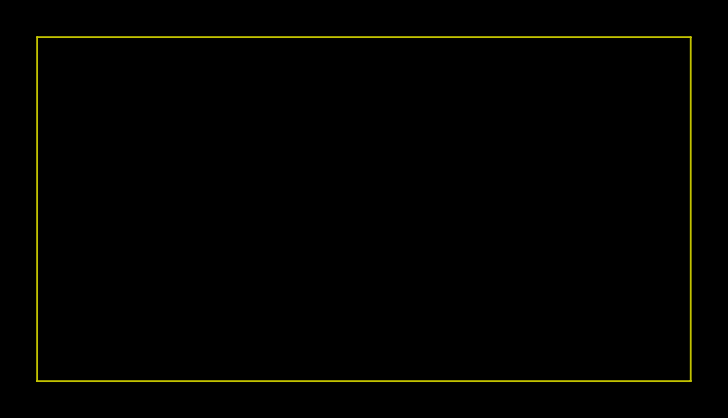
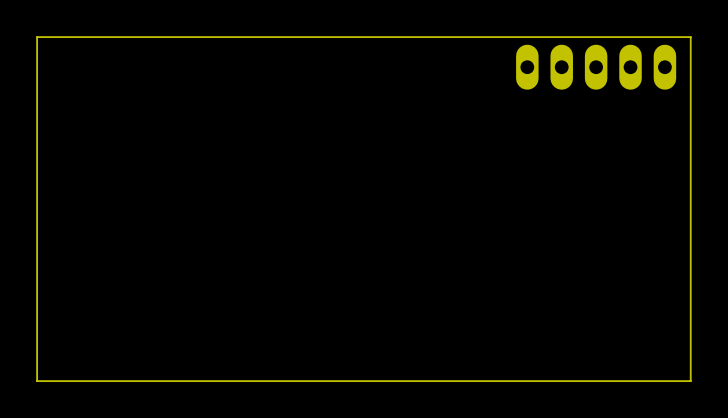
part: none -> (596, 67)

